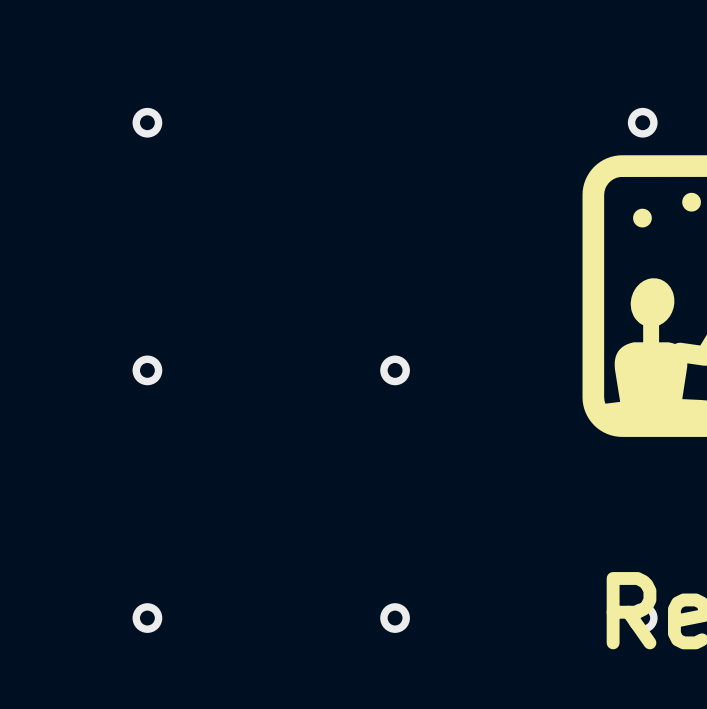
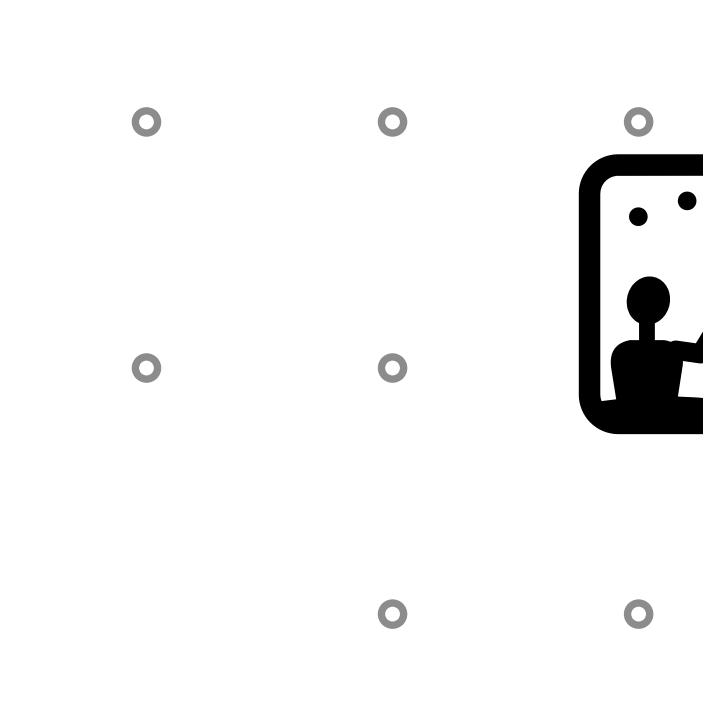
via: none -> (392, 121)
via: (147, 618) -> none

